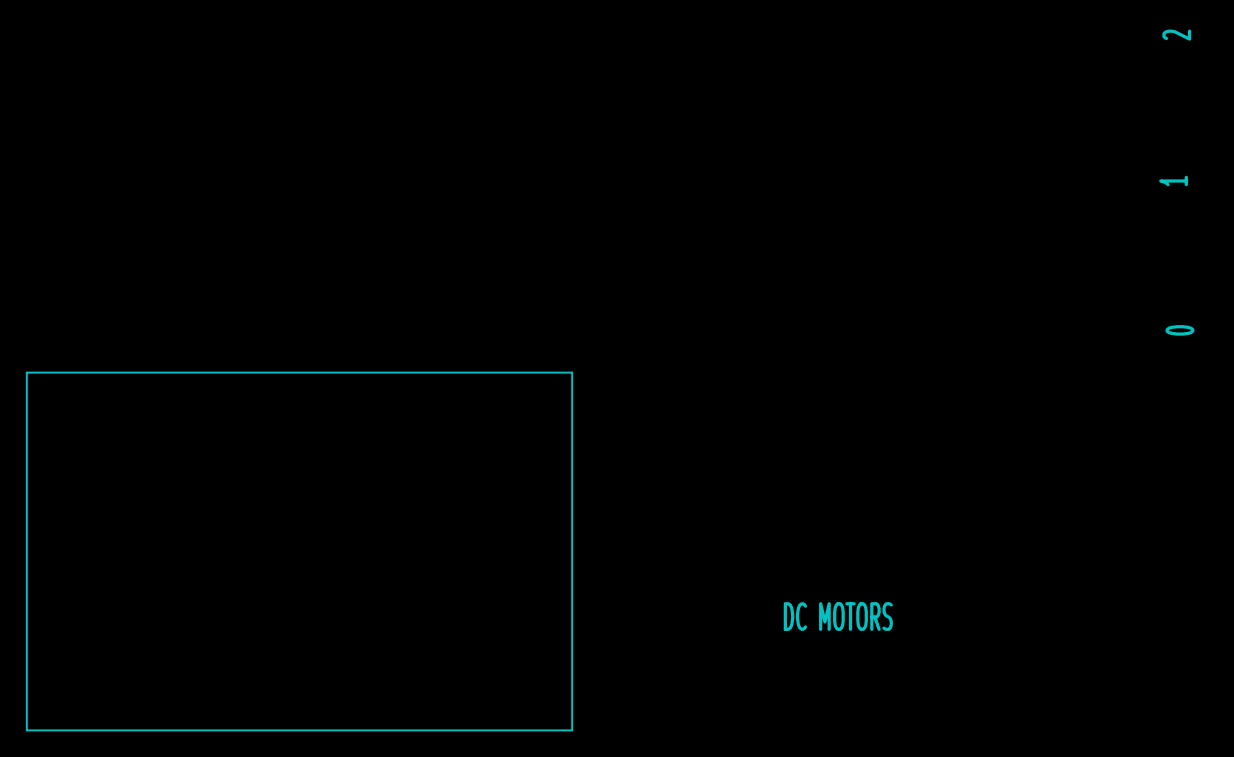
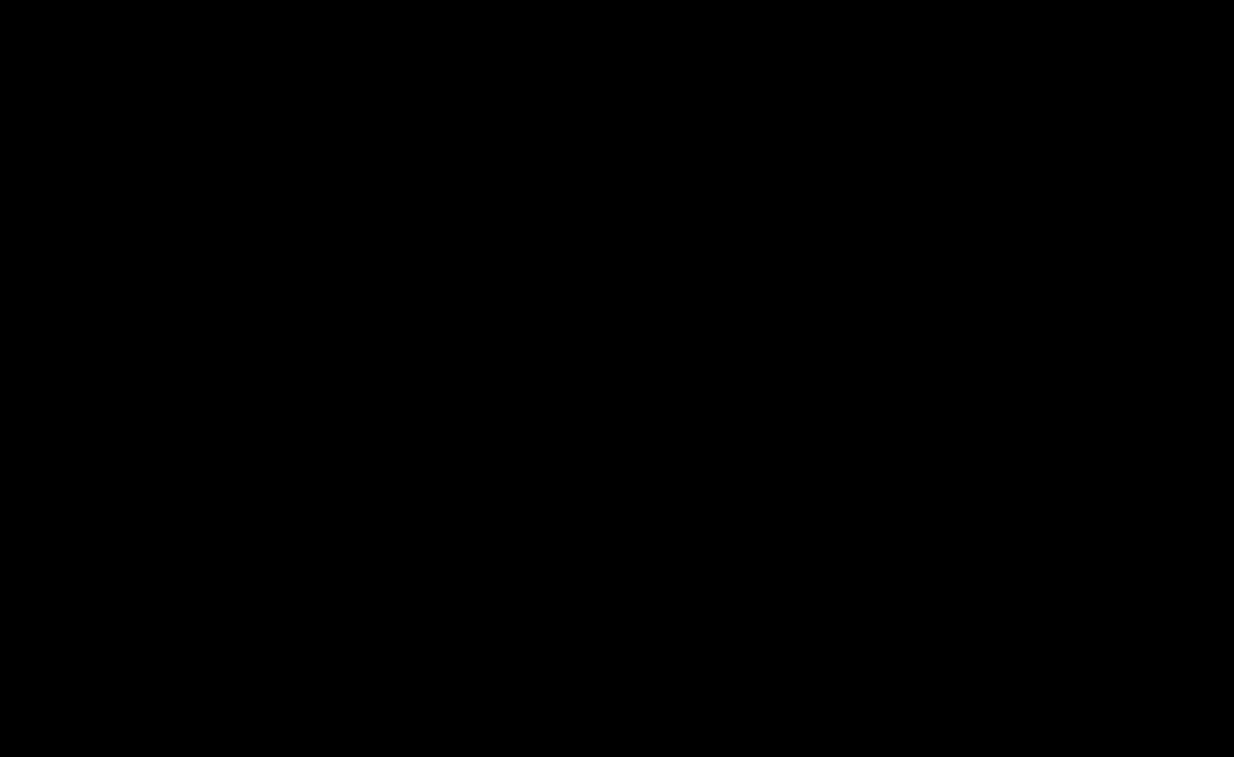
text: 2 (1176, 35) -> none
text: 1 (1173, 180) -> none
text: 0 (1180, 330) -> none
line: (26, 372) (572, 372) (572, 730) (26, 730) (26, 372) -> none
text: DC MOTORS (838, 616) -> none

